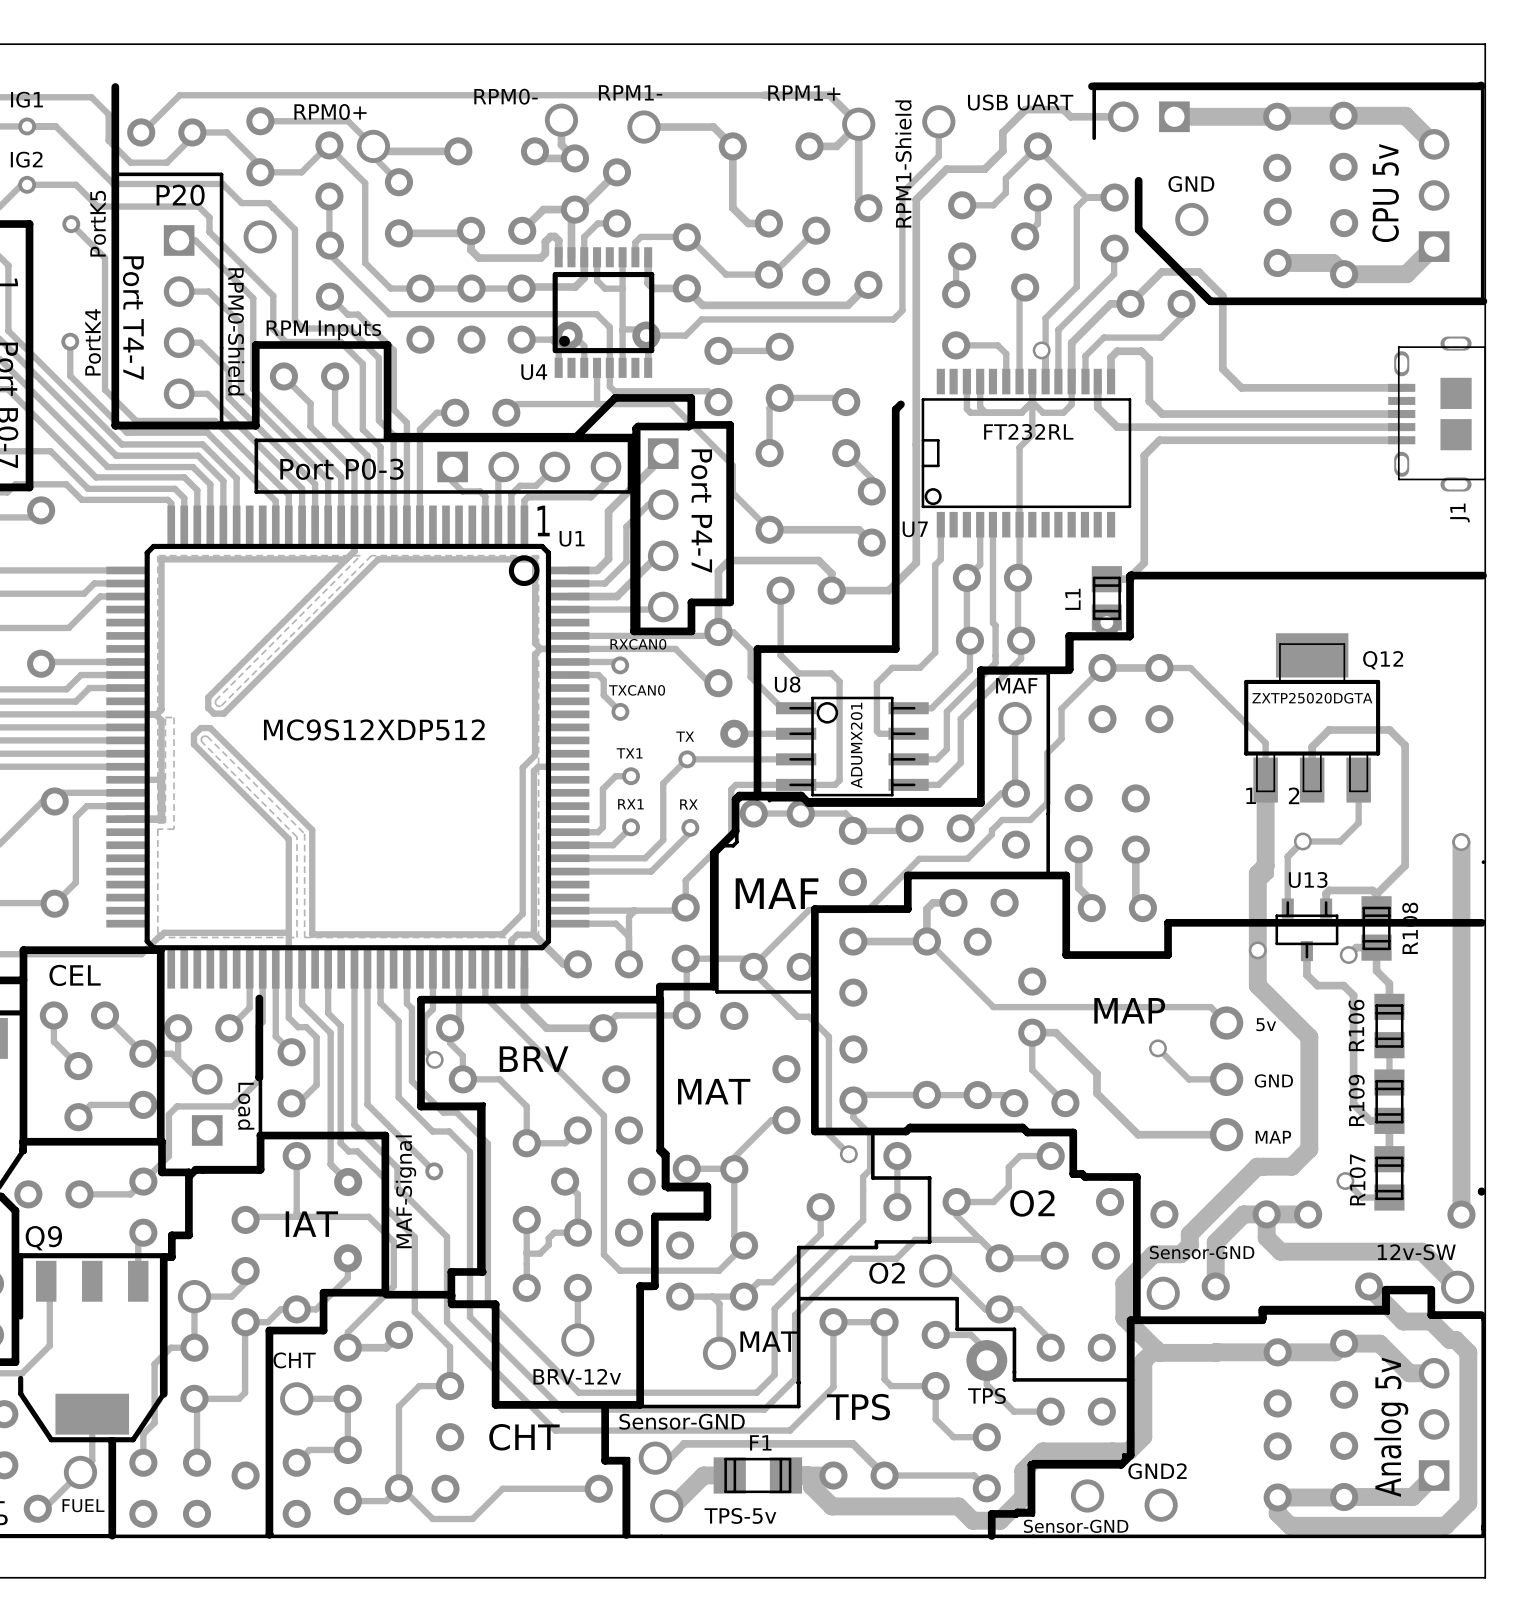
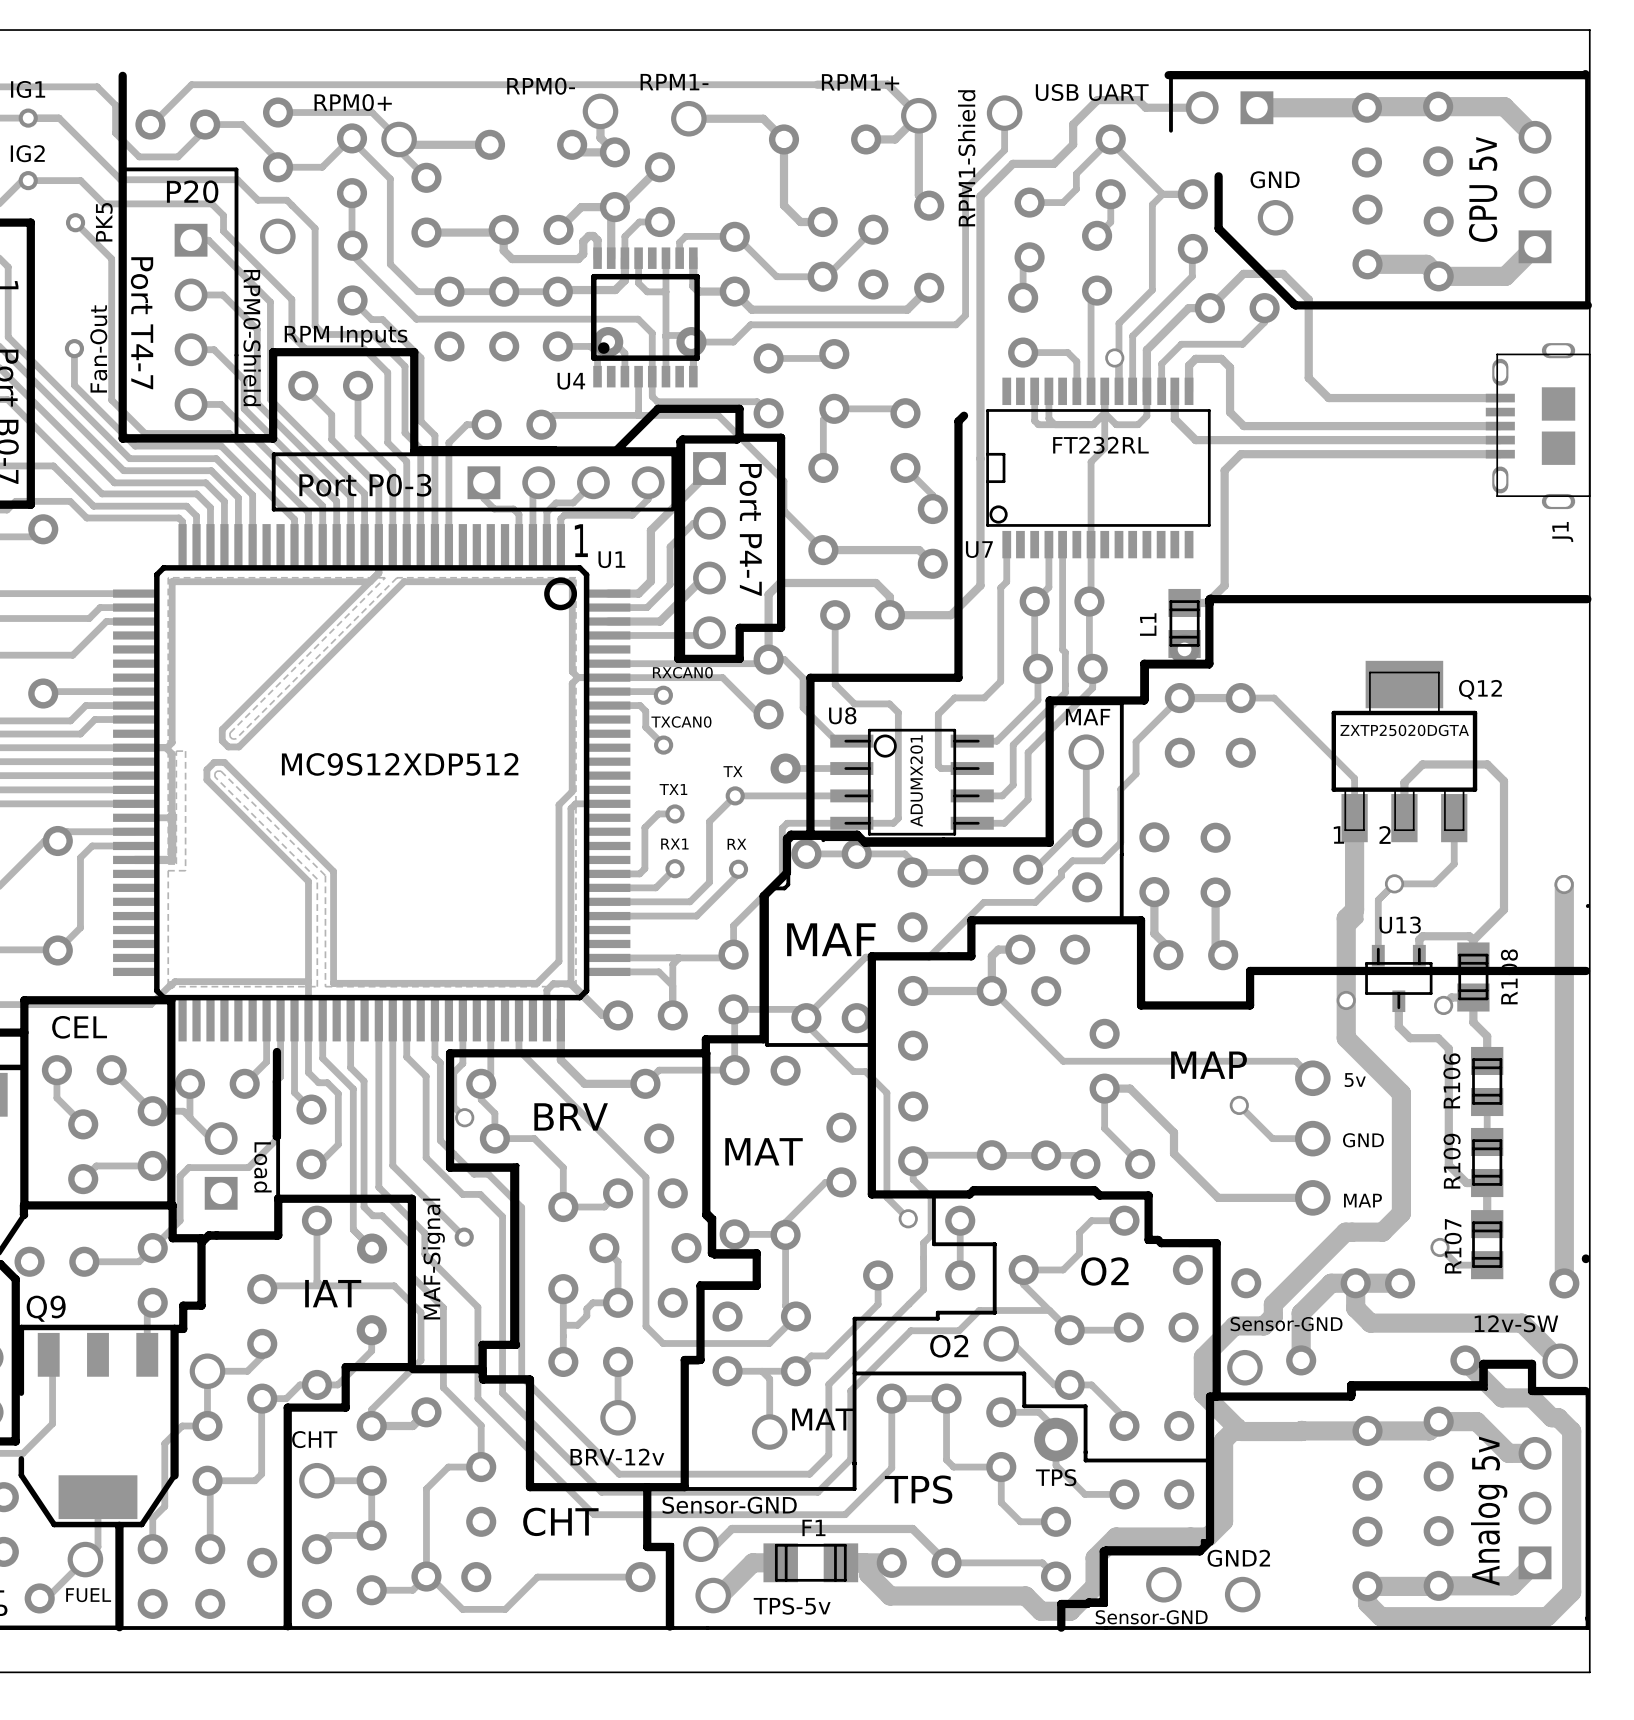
text: PortK5 (98, 223) -> PK5 (104, 222)
text: PortK4 (93, 342) -> Fan-Out (98, 348)

